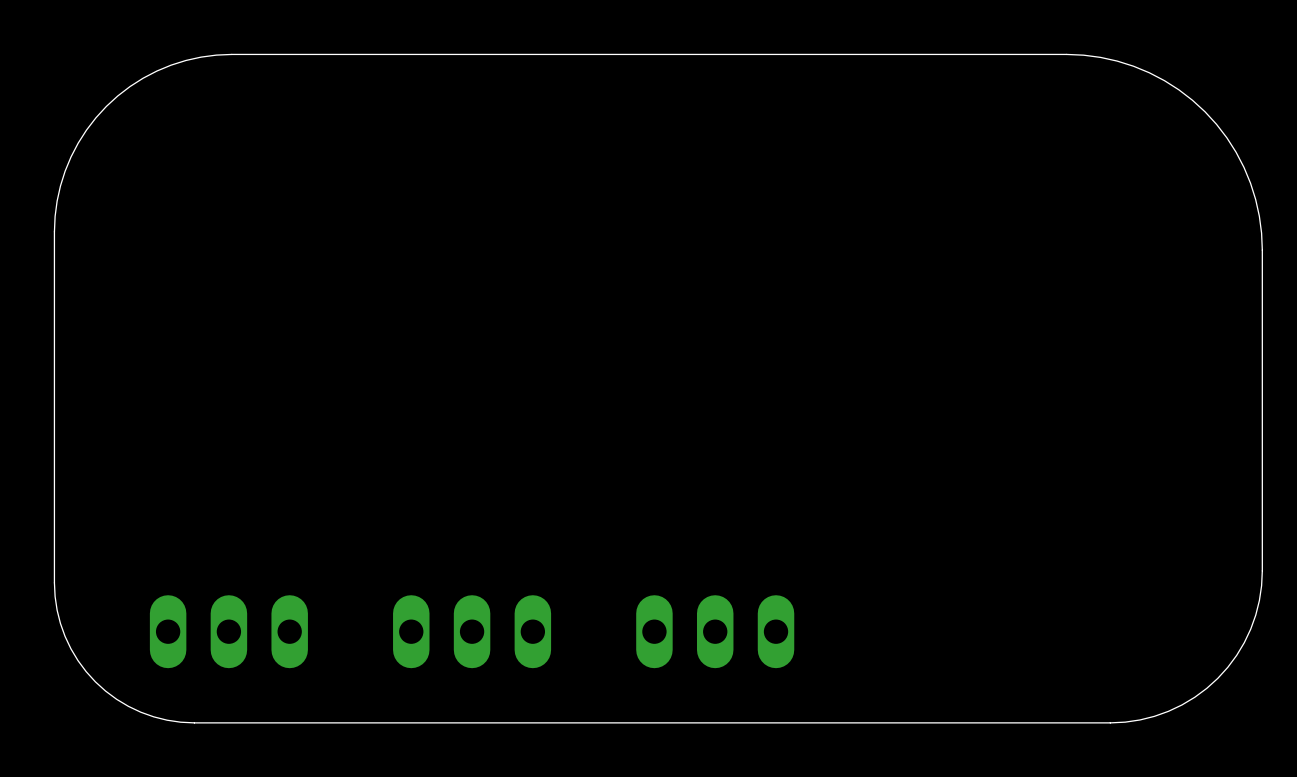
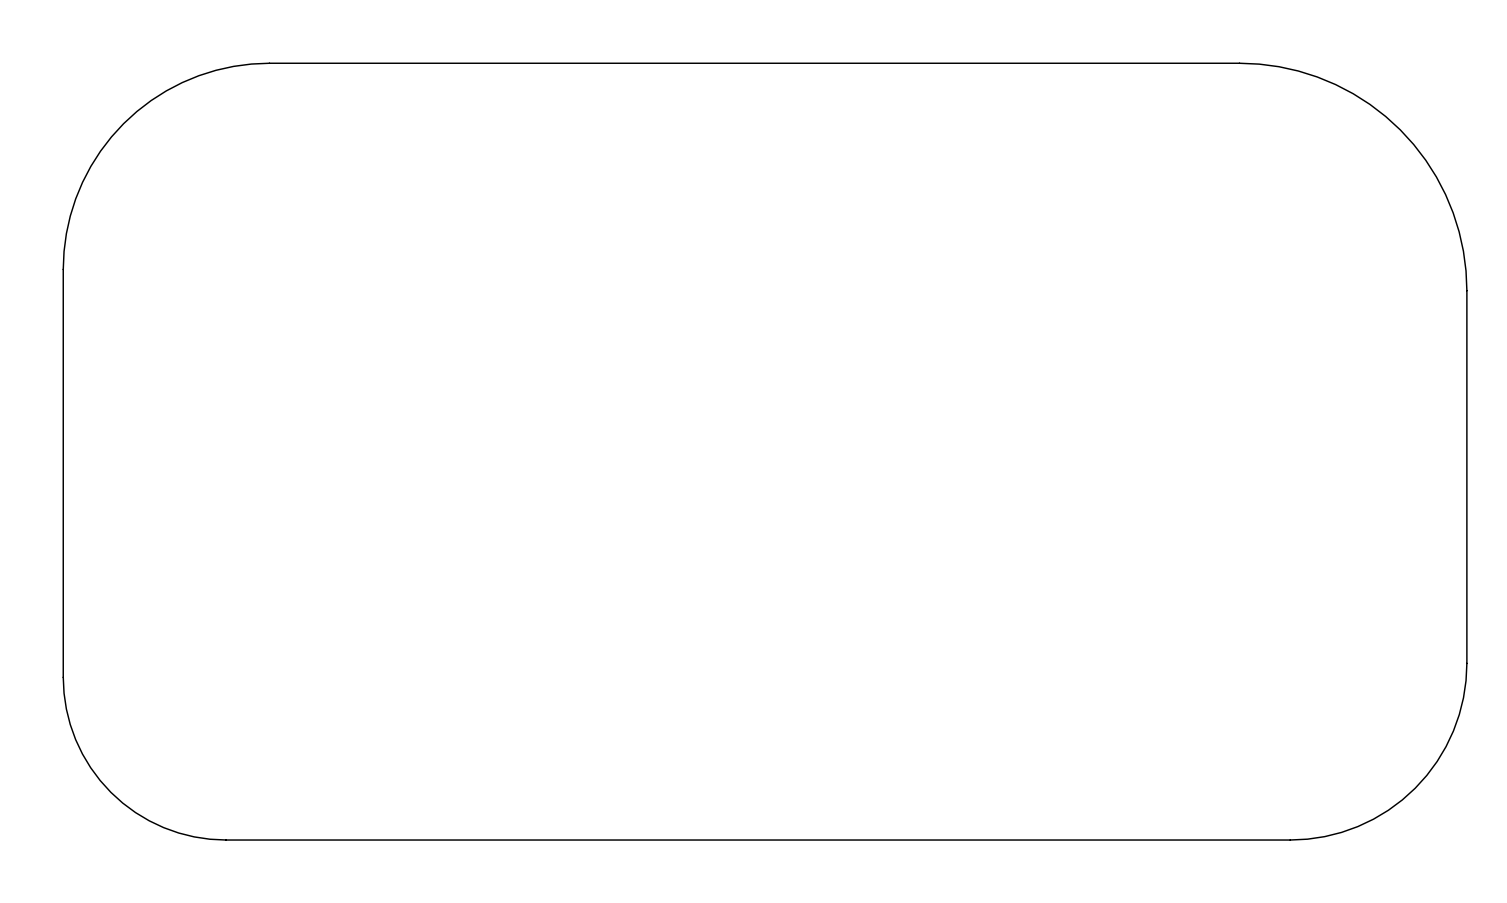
part: (228, 631) -> none
part: (472, 631) -> none
part: (715, 631) -> none

